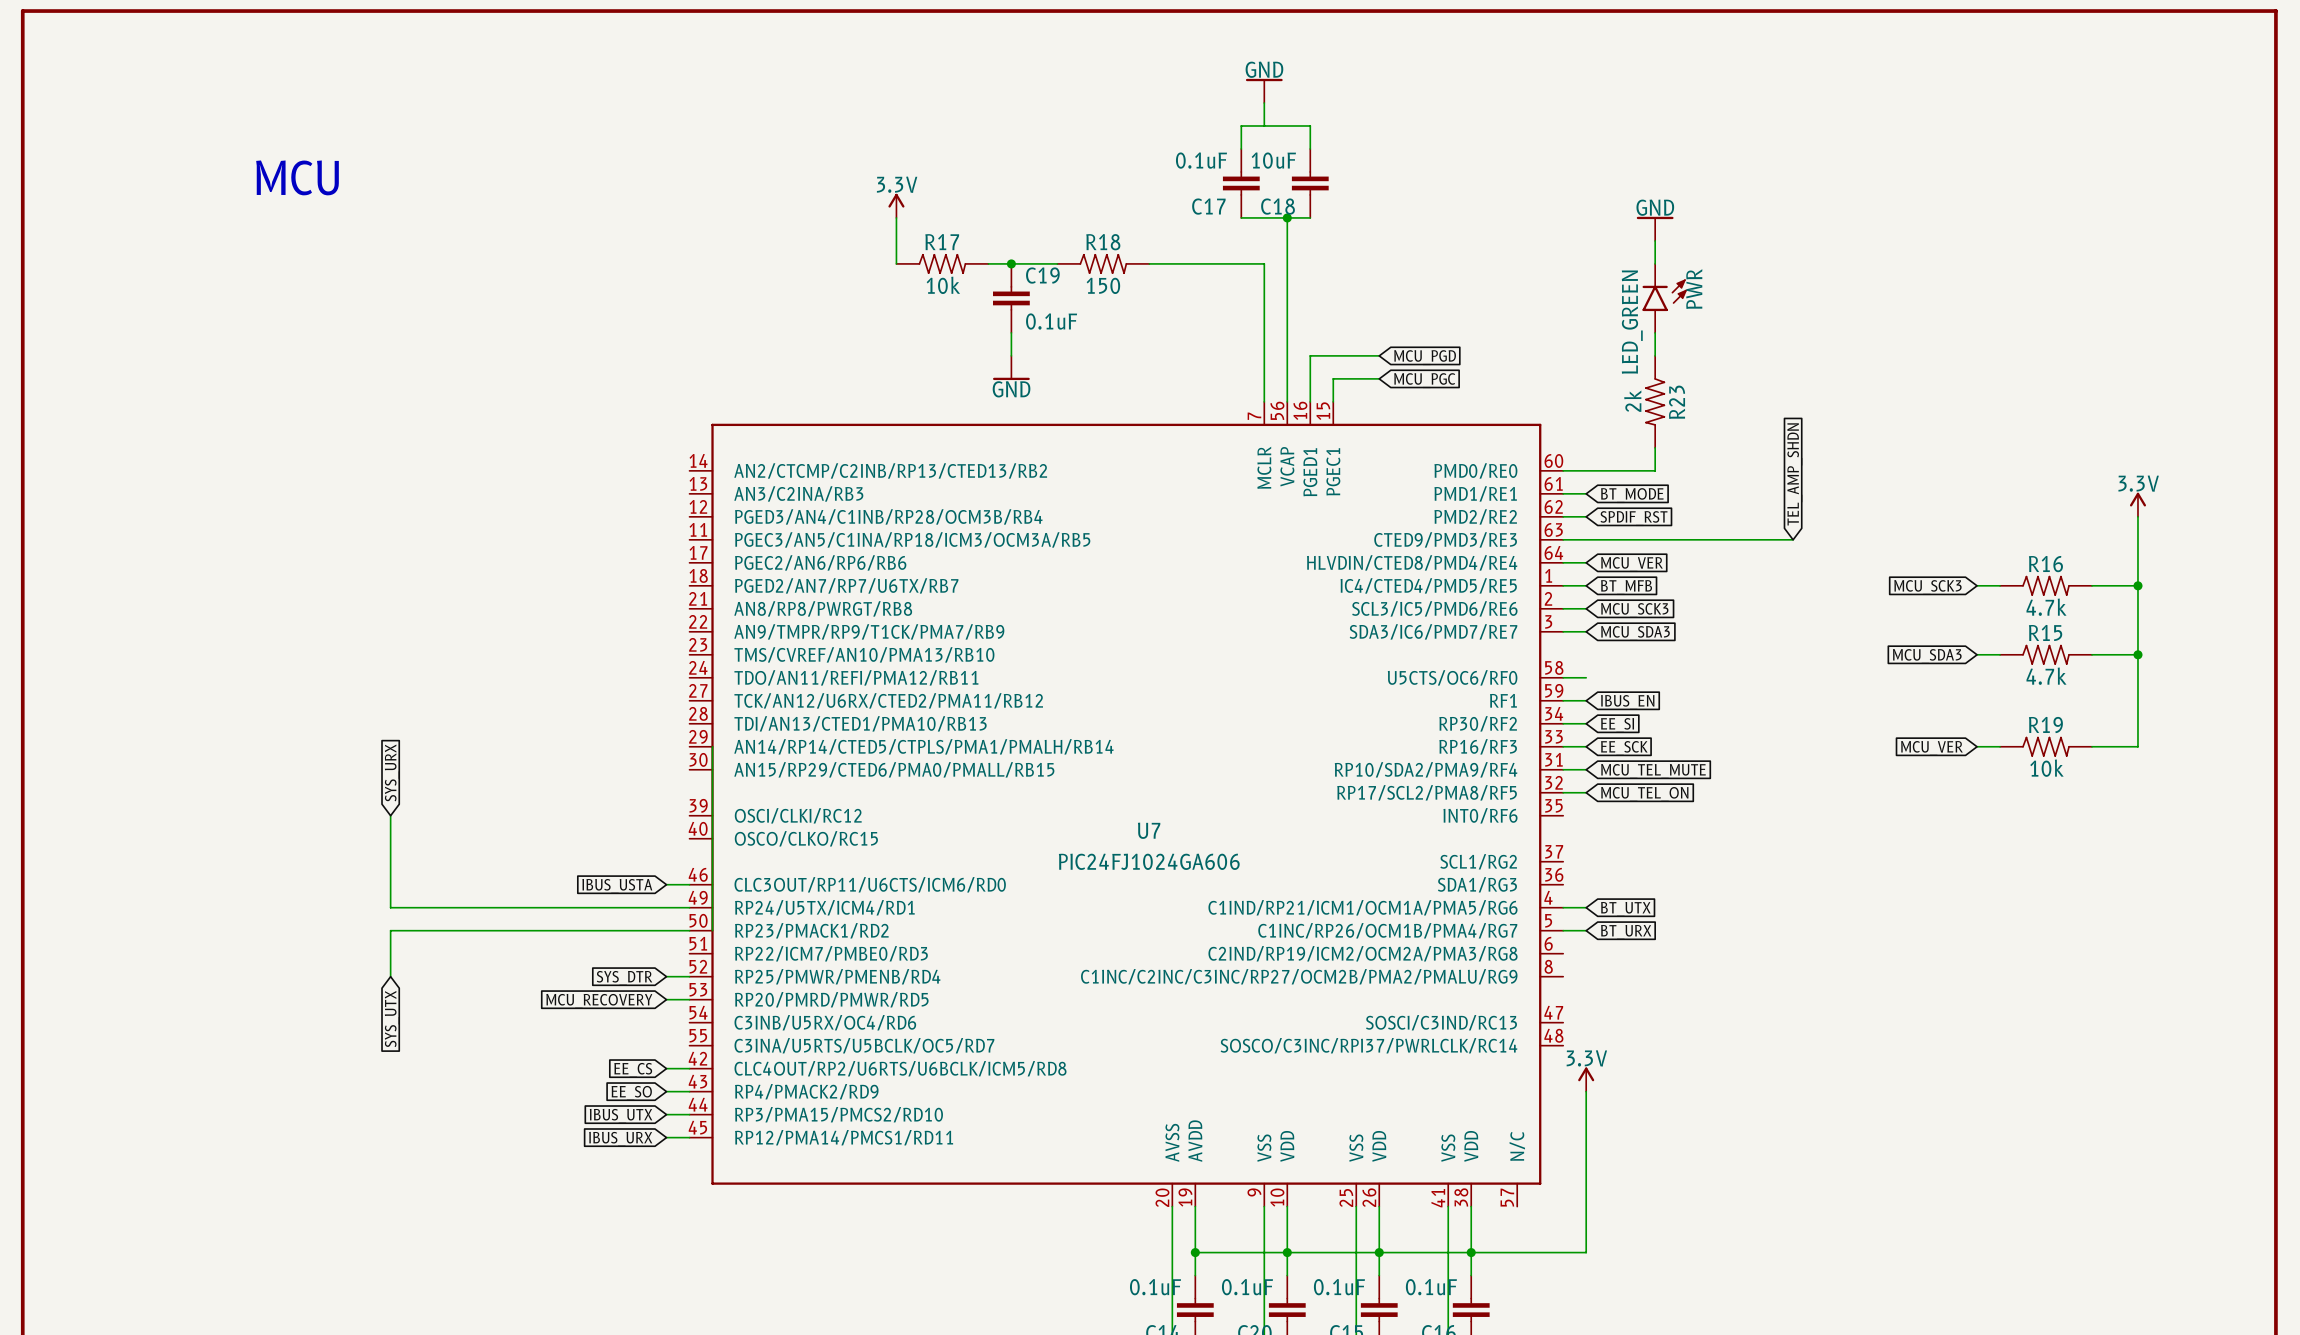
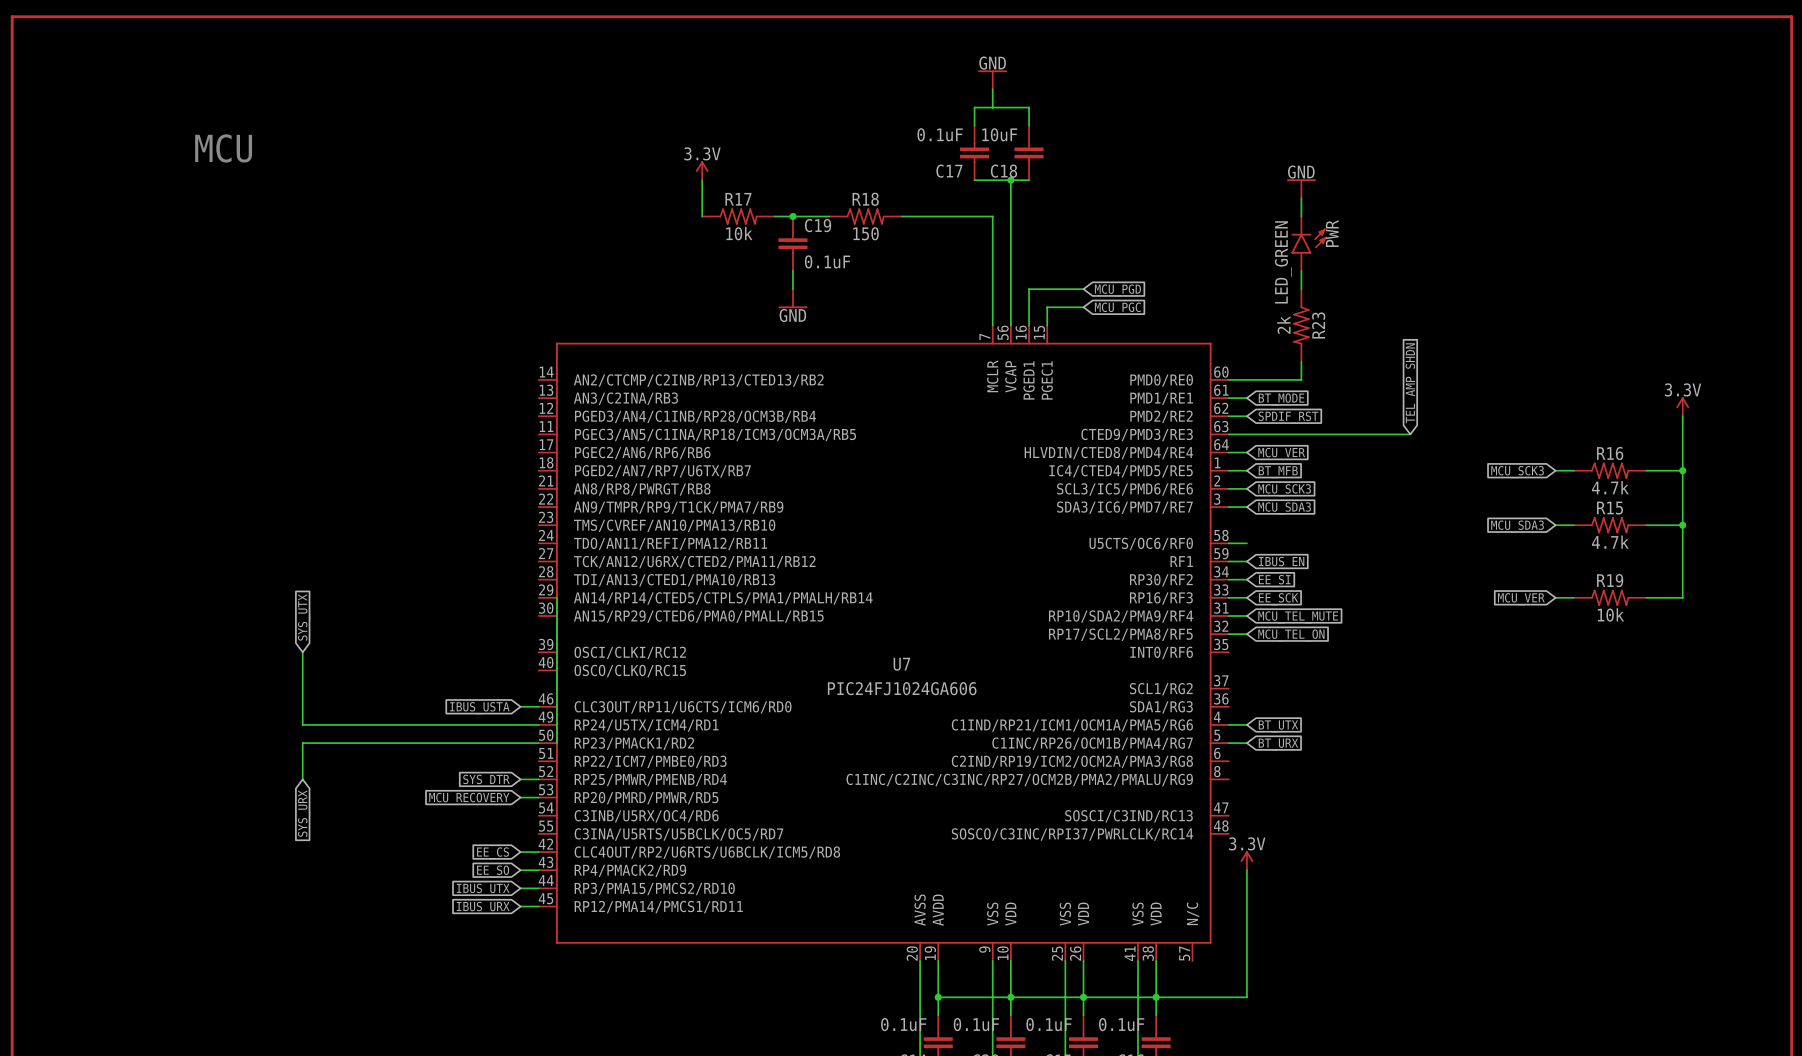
global label: SYS_URX (392, 772) -> SYS_UTX (304, 617)
global label: SYS_UTX (392, 1019) -> SYS_URX (304, 813)

